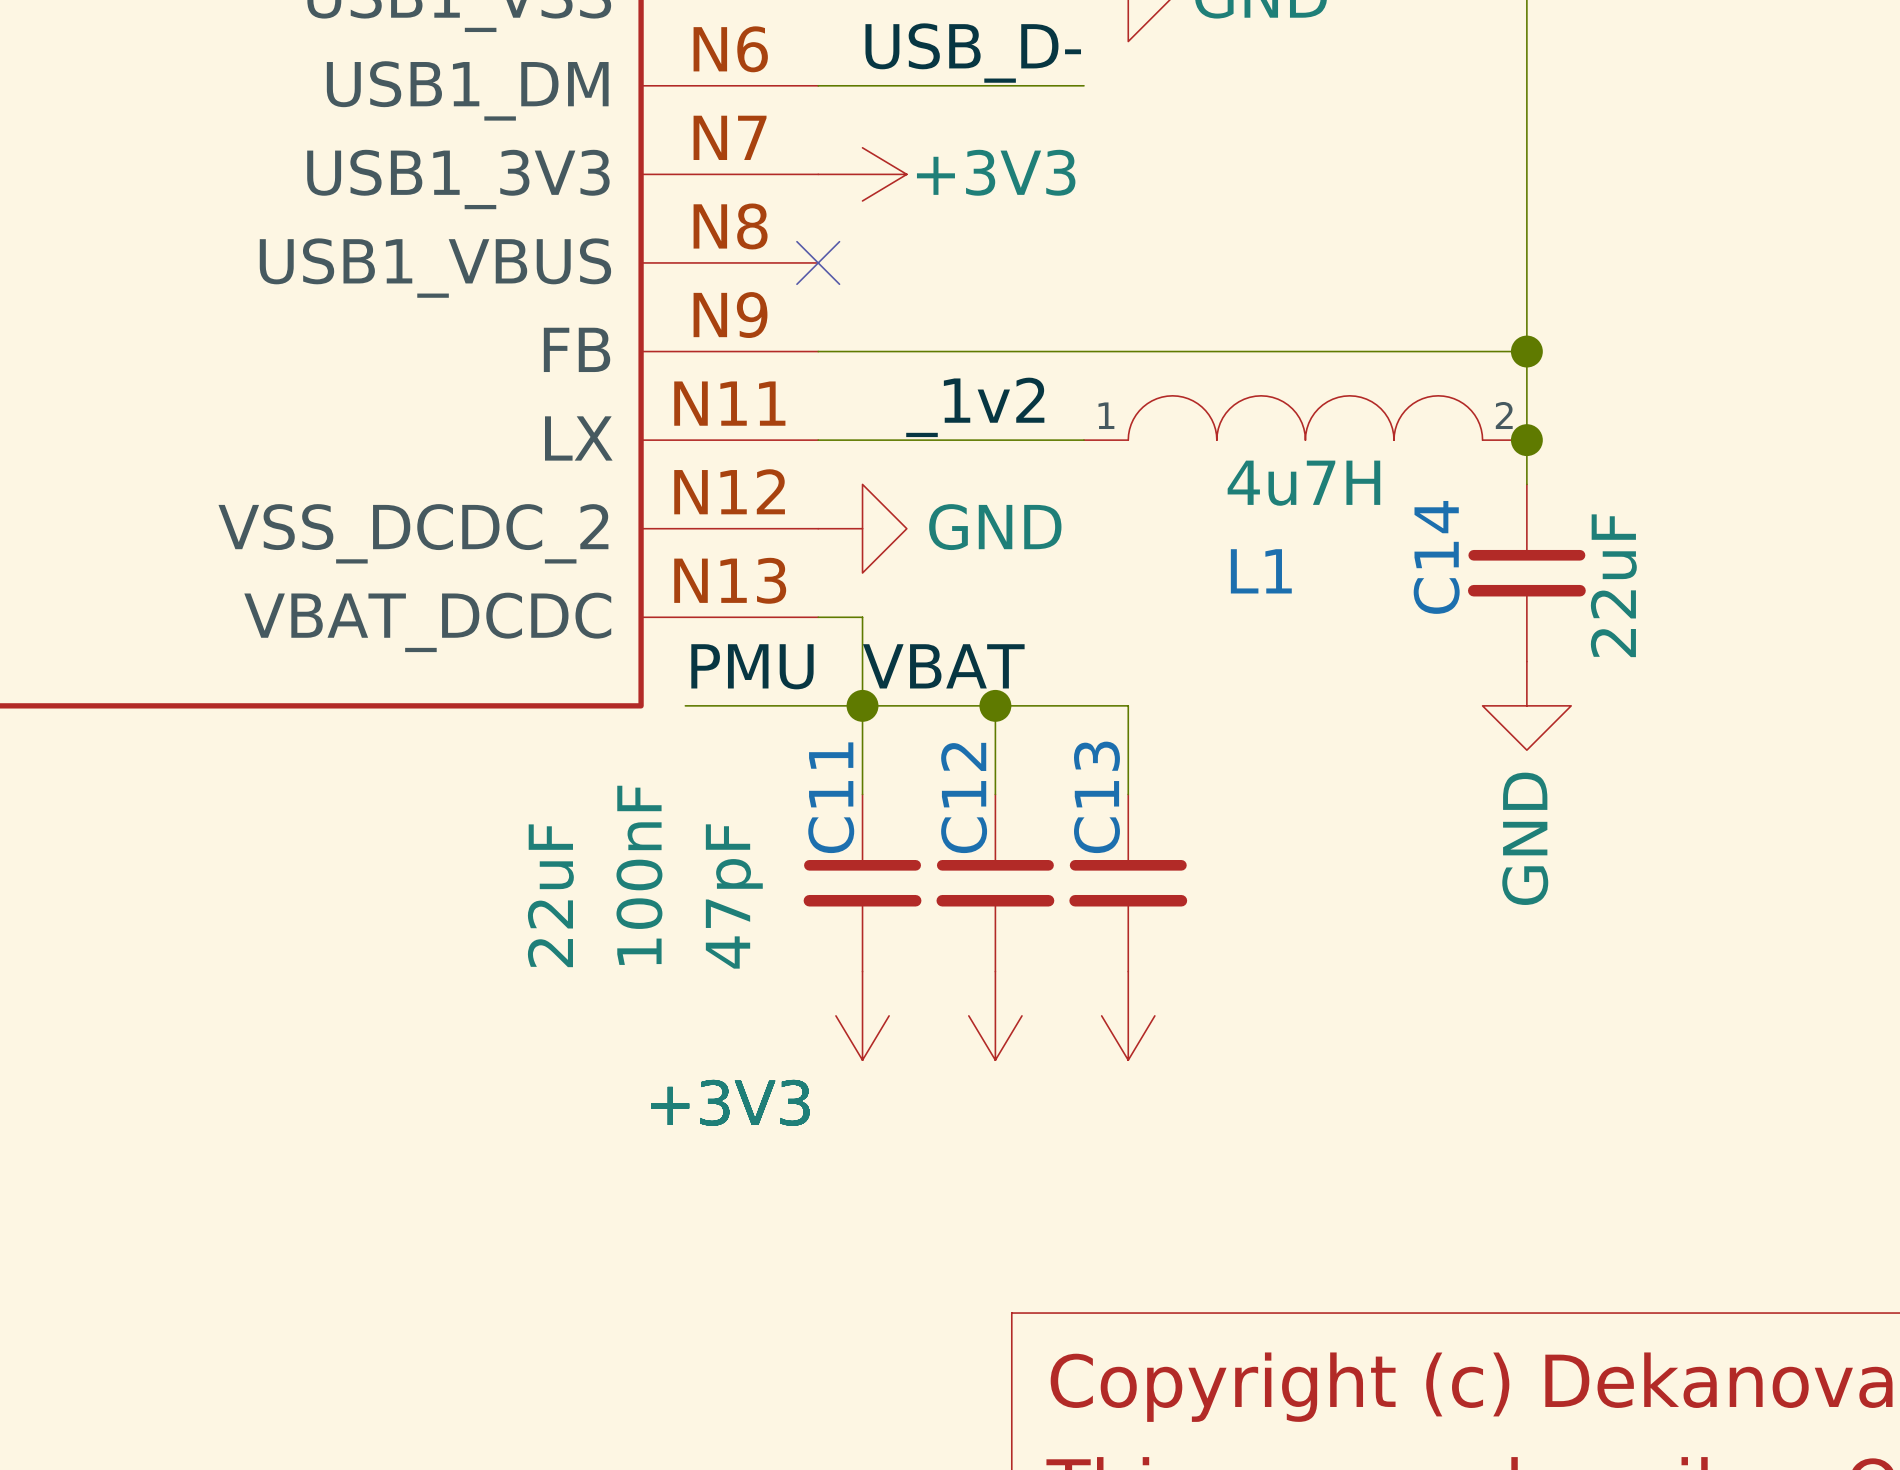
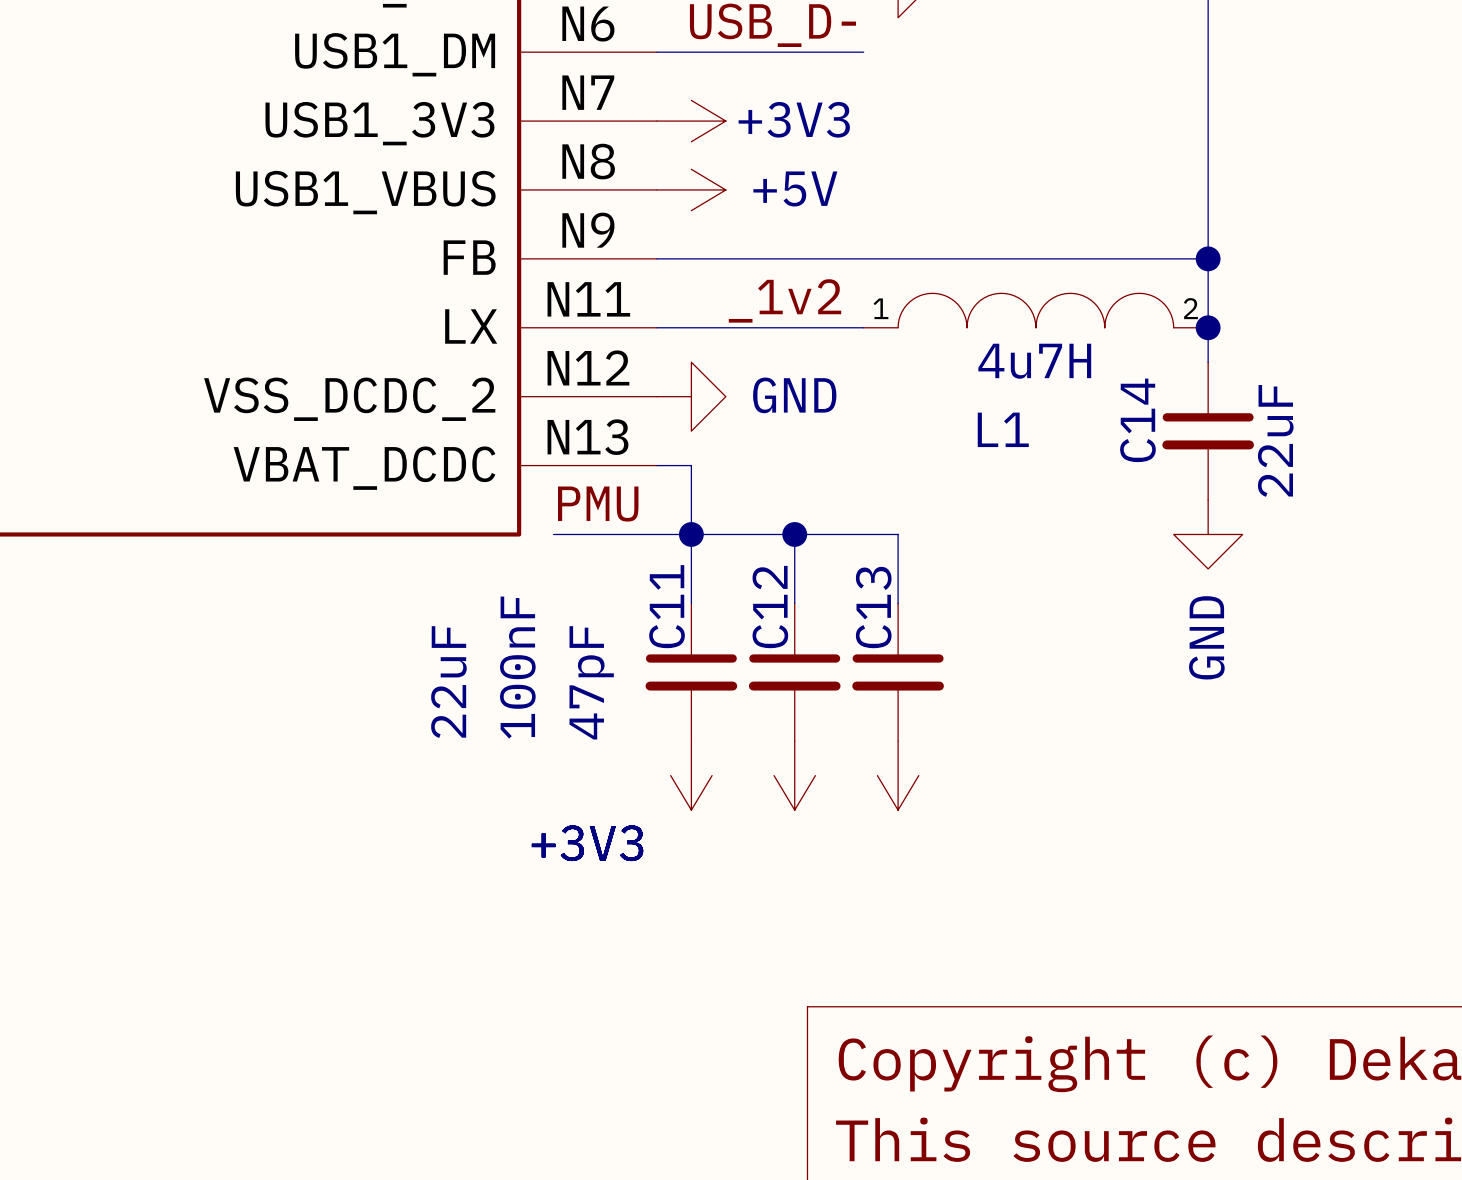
no-connect mark: (818, 262) -> none
power symbol: none -> +5V (691, 189)
label: VBAT (943, 666) -> none

